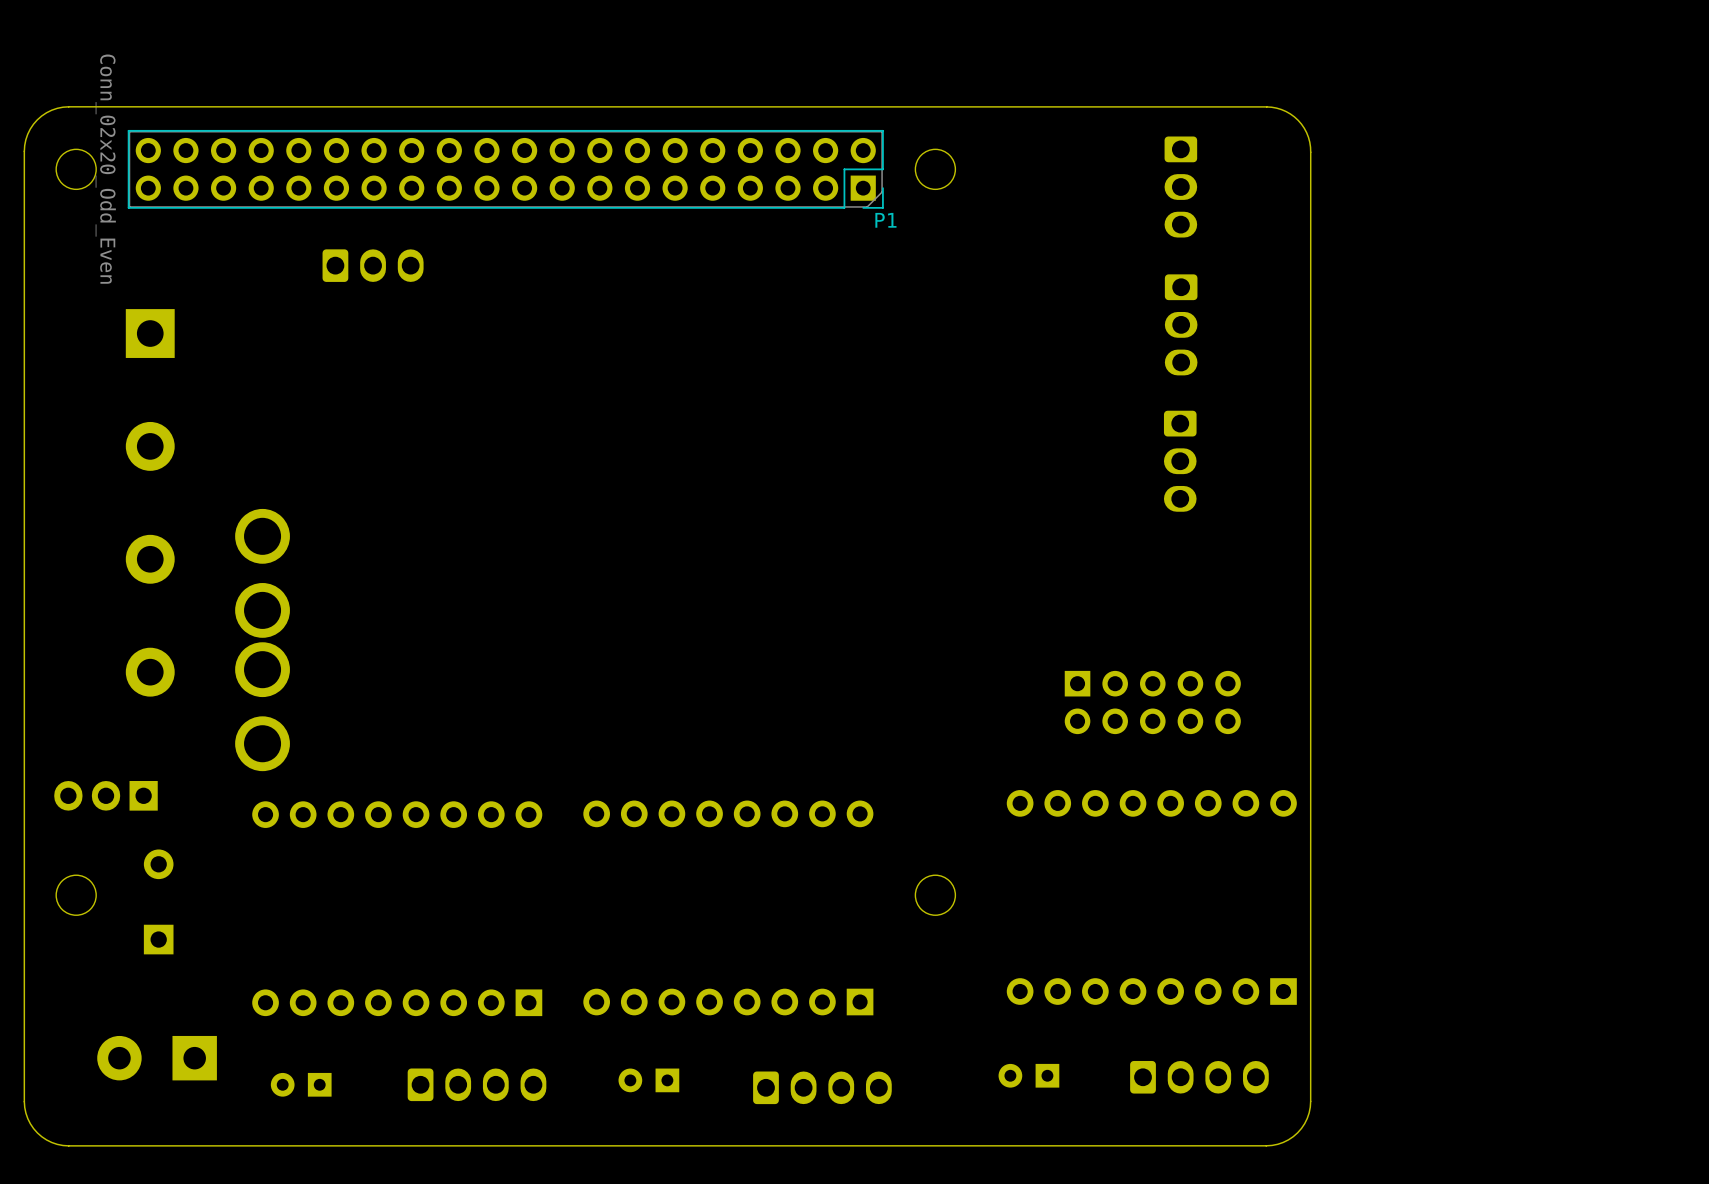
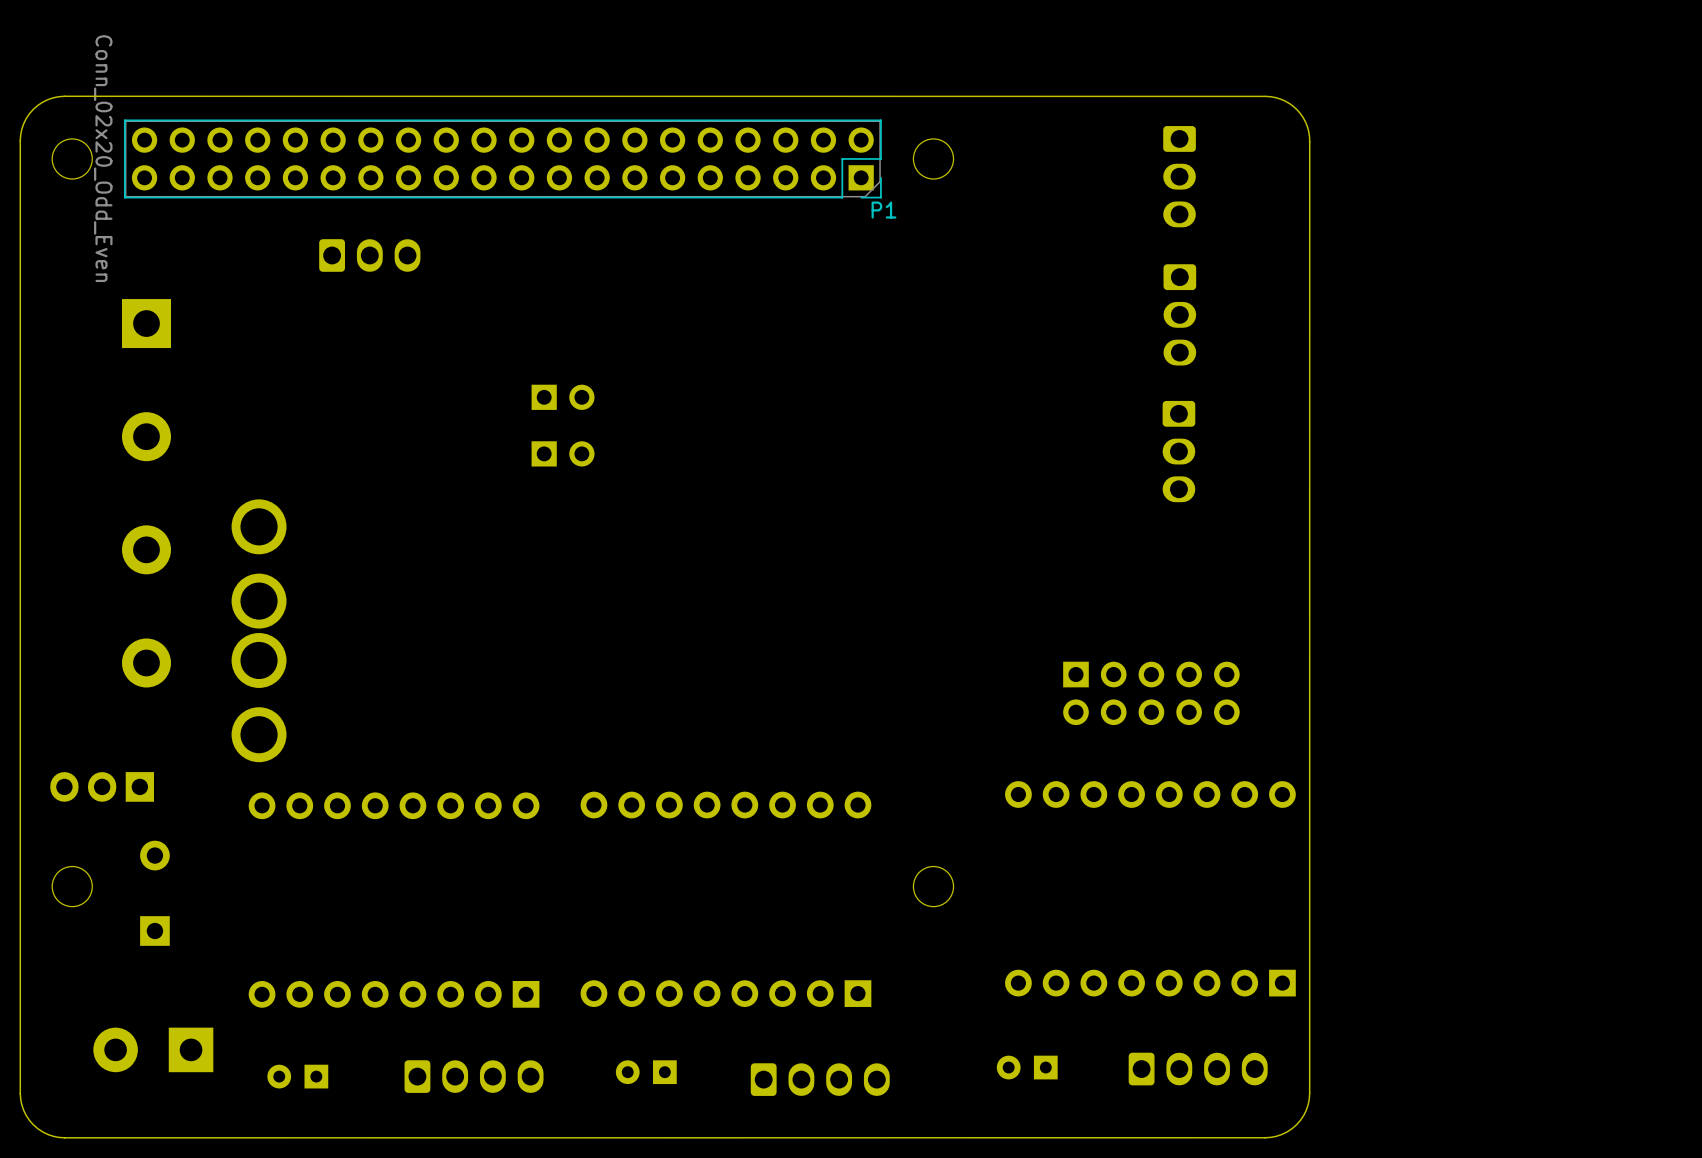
part: none -> (563, 397)
part: none -> (563, 453)

